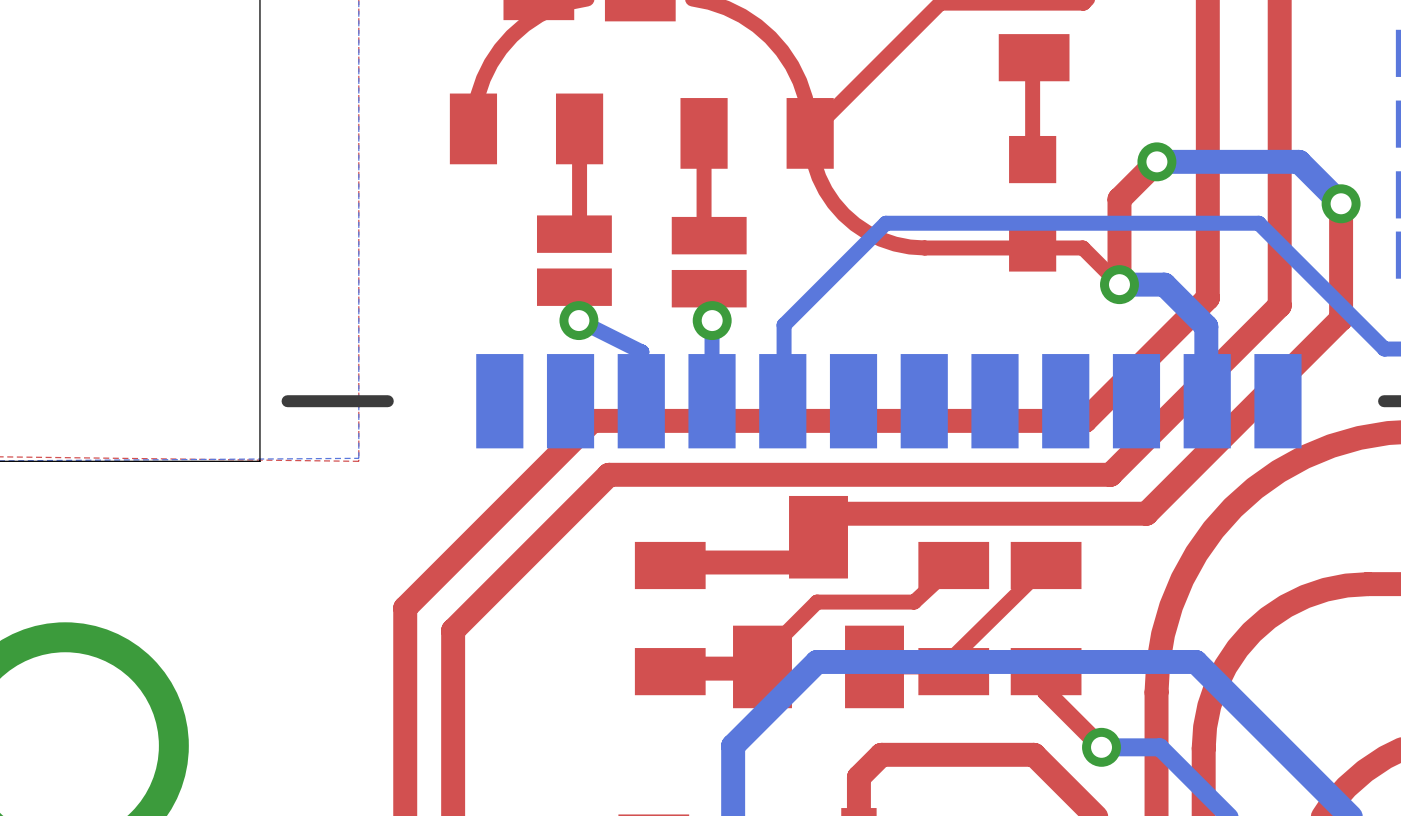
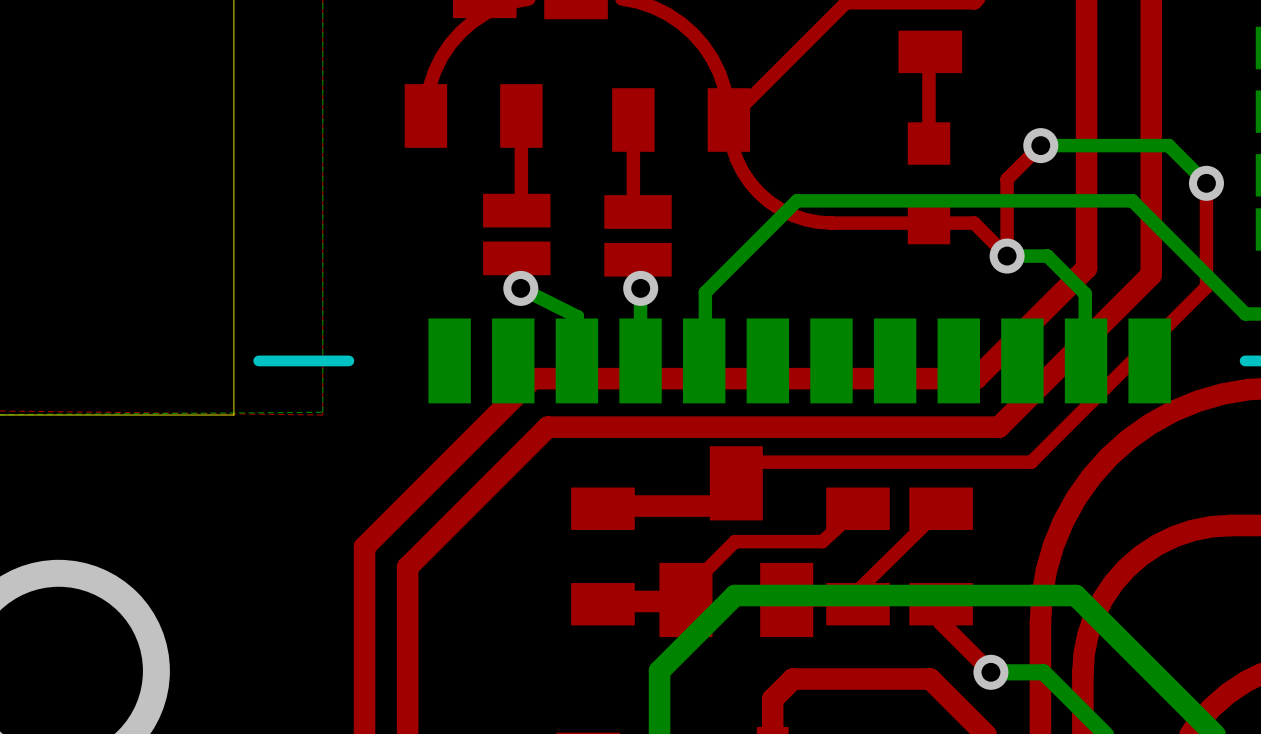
top track width: thick (1156, 161) (1119, 199) (1119, 284) -> thin (1040, 145) (1007, 179) (1007, 256)
bottom track width: thick (1156, 161) (1299, 161) (1341, 203) -> thin (1040, 145) (1168, 145) (1206, 183)
top track width: thick (1341, 203) (1341, 319) (1146, 513) (843, 513) -> thin (1206, 183) (1206, 287) (1031, 462) (759, 462)
bottom track width: thick (1119, 284) (1164, 284) (1206, 326) (1206, 400) -> thin (1007, 256) (1047, 256) (1085, 293) (1085, 360)

